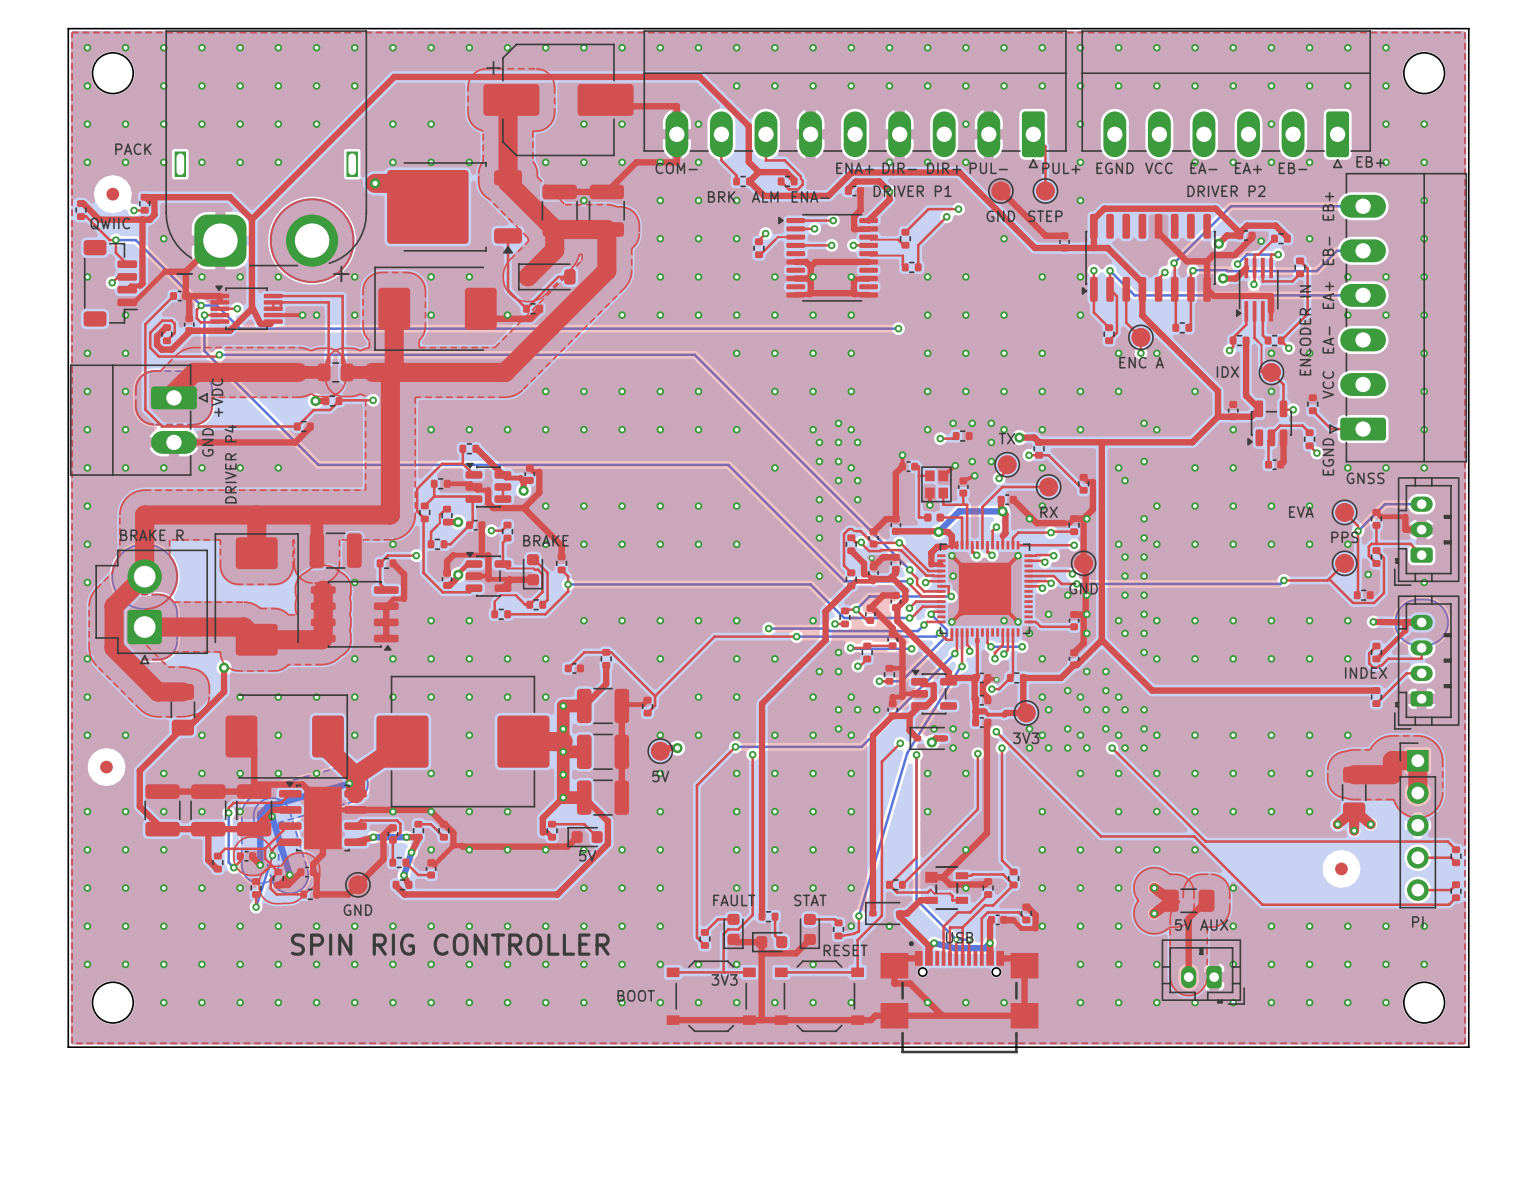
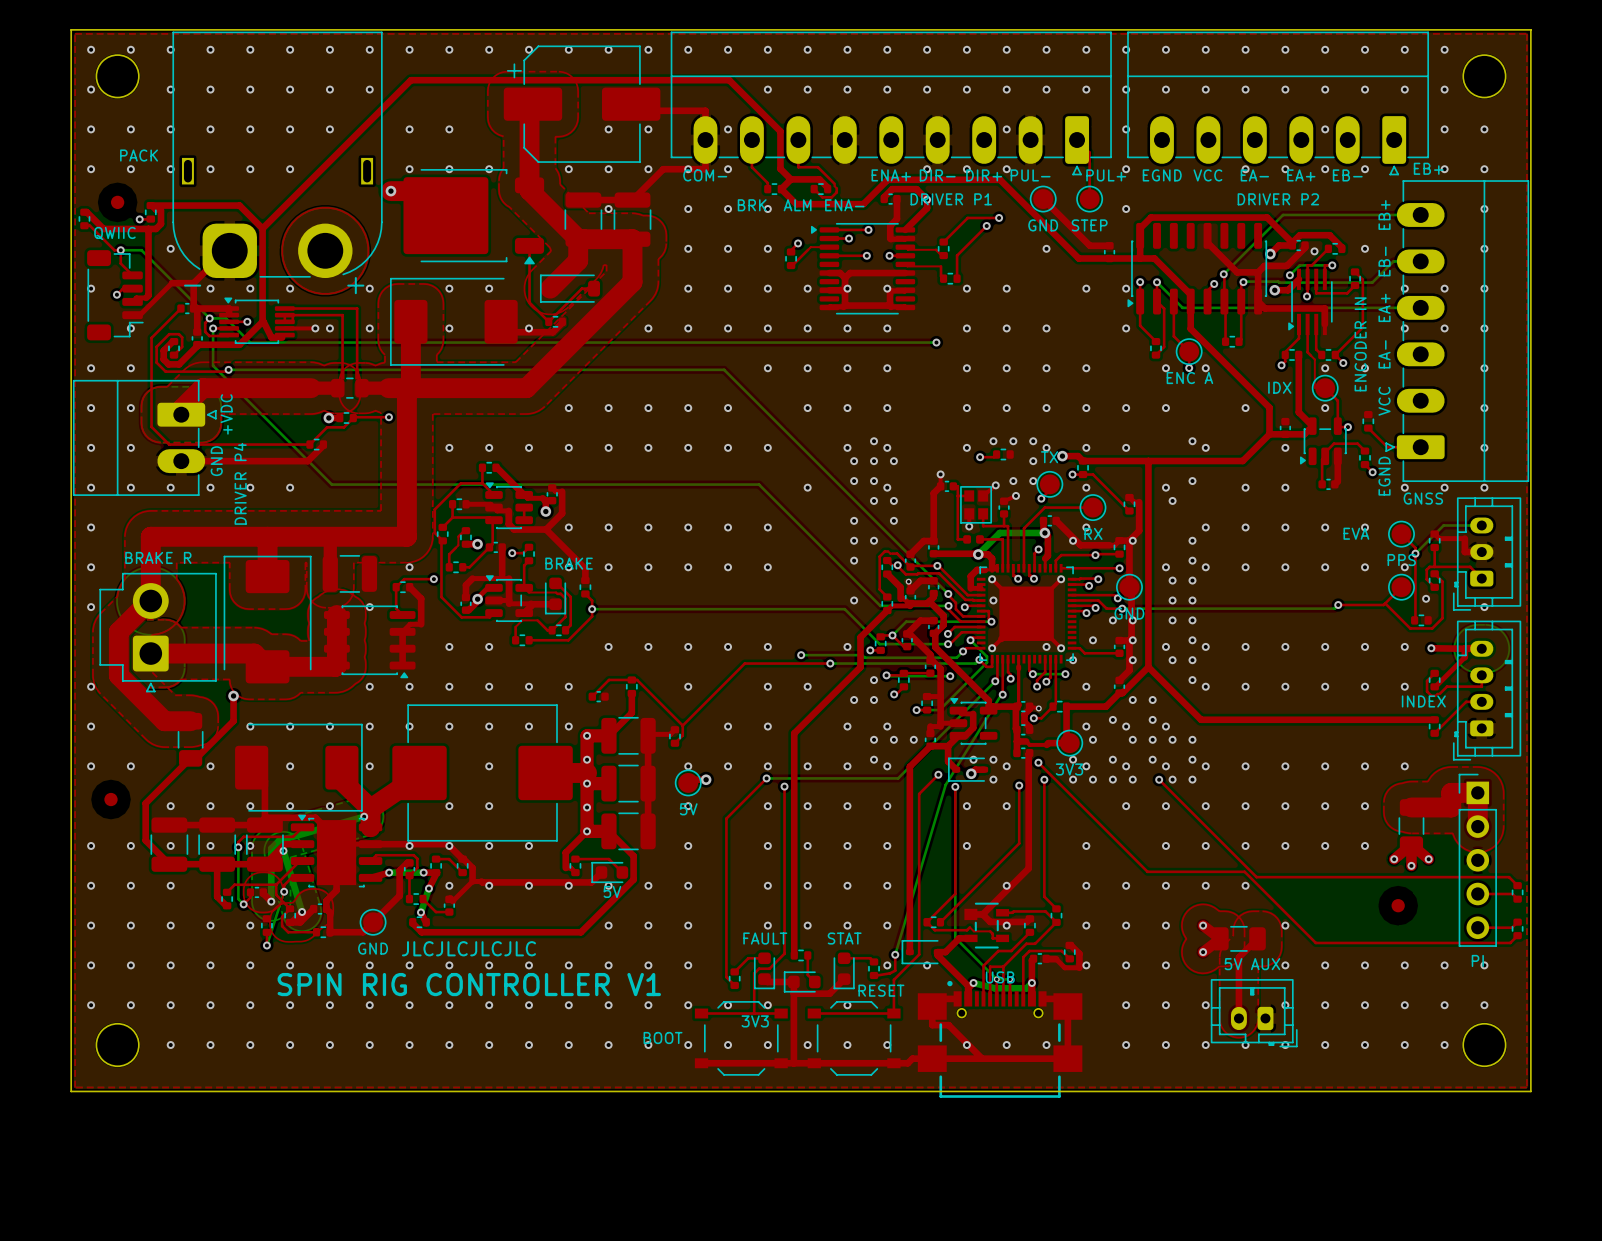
text: none -> JLCJLCJLCJLC (468, 948)
text: SPIN RIG CONTROLLER (450, 944) -> SPIN RIG CONTROLLER V1 (469, 984)

